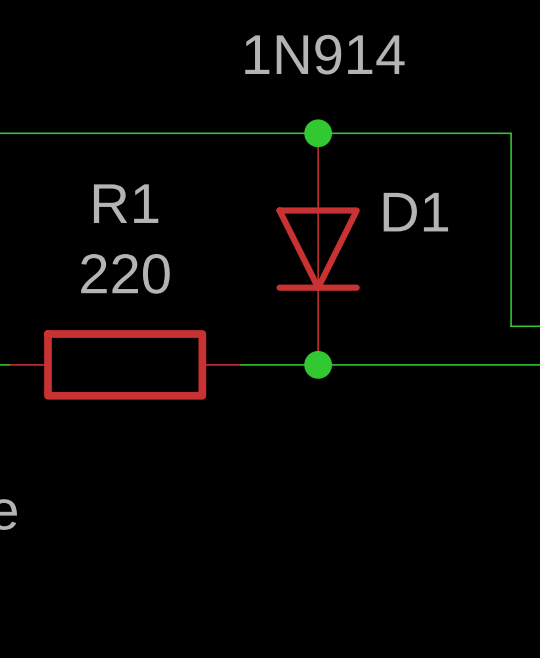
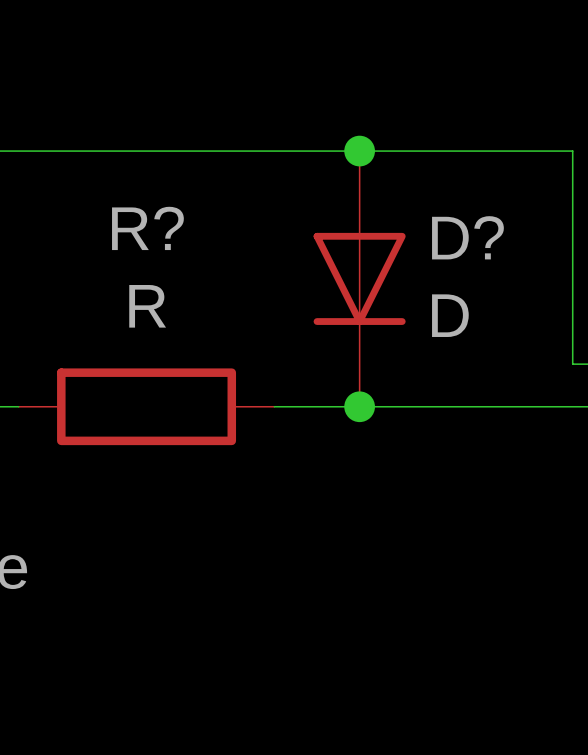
D1 value: 1N914 (324, 54) -> D (450, 315)
R1 name: R1 (126, 203) -> R? (147, 228)
D1 name: D1 (415, 212) -> D? (467, 237)
R1 value: 220 (125, 273) -> R (147, 306)

